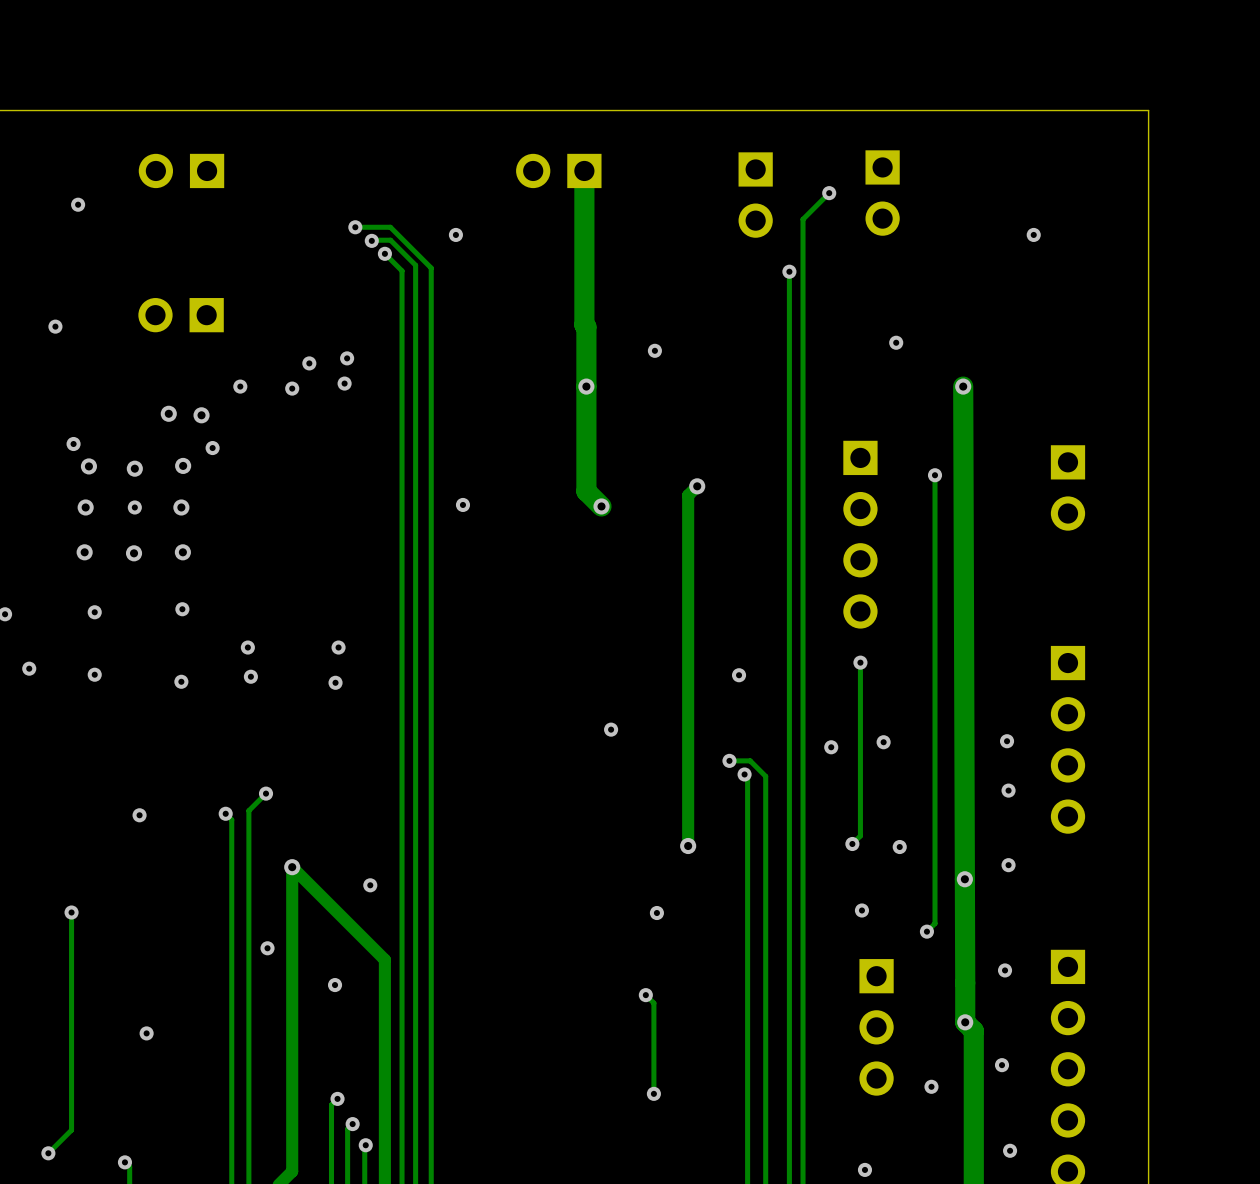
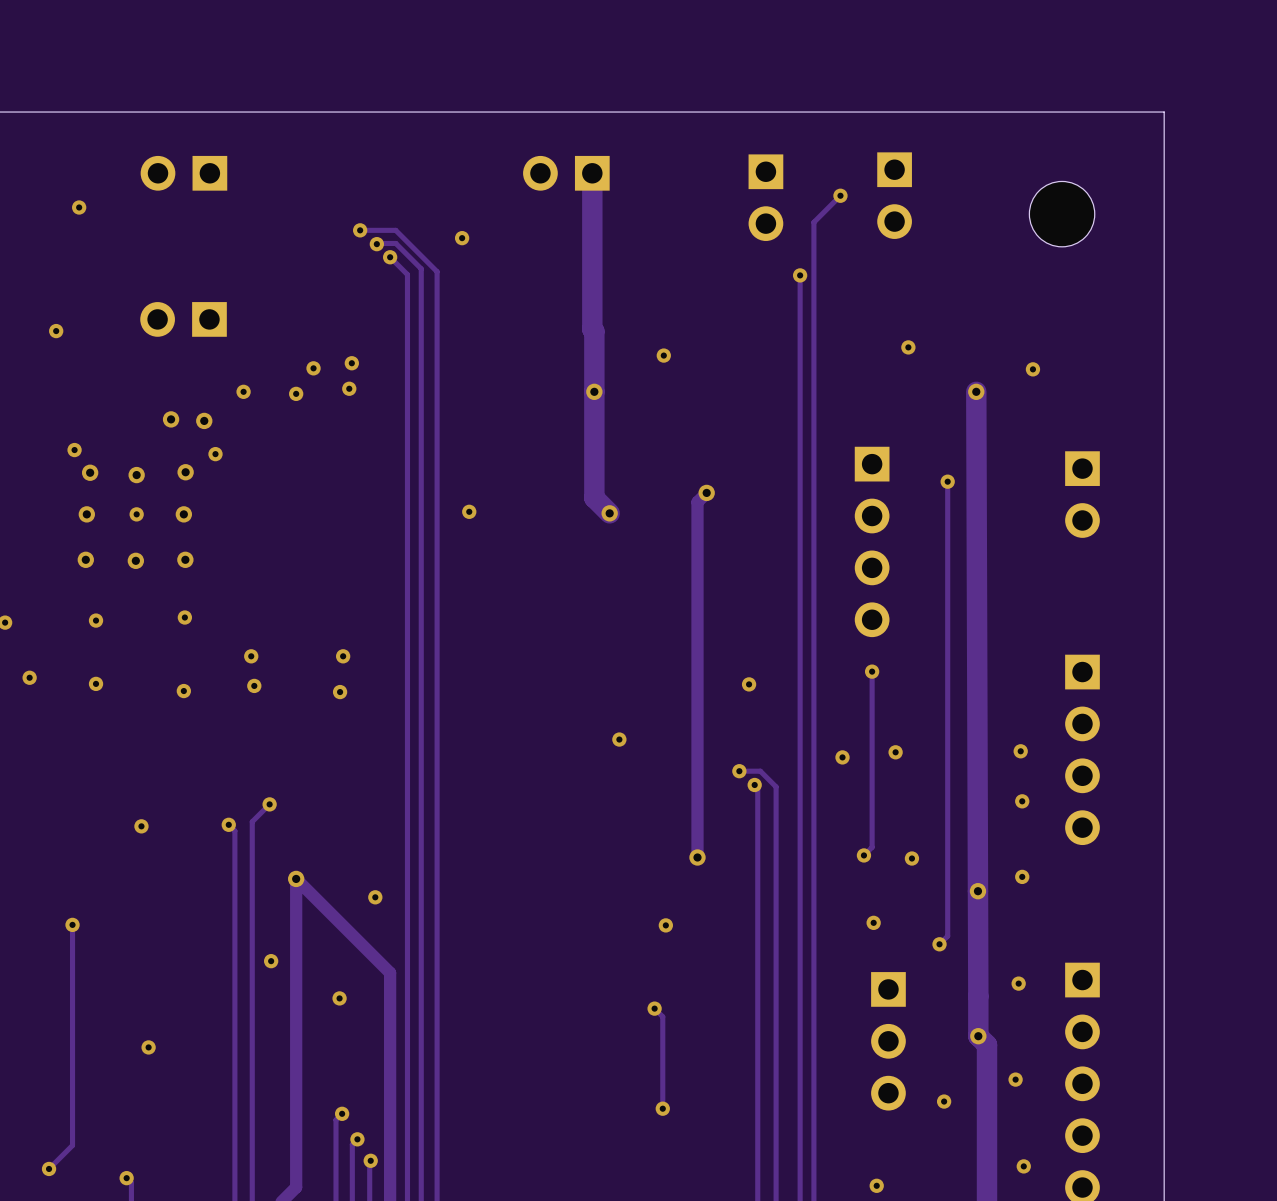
part: none -> (1062, 214)
via: (1033, 234) -> none
via: none -> (1032, 369)

